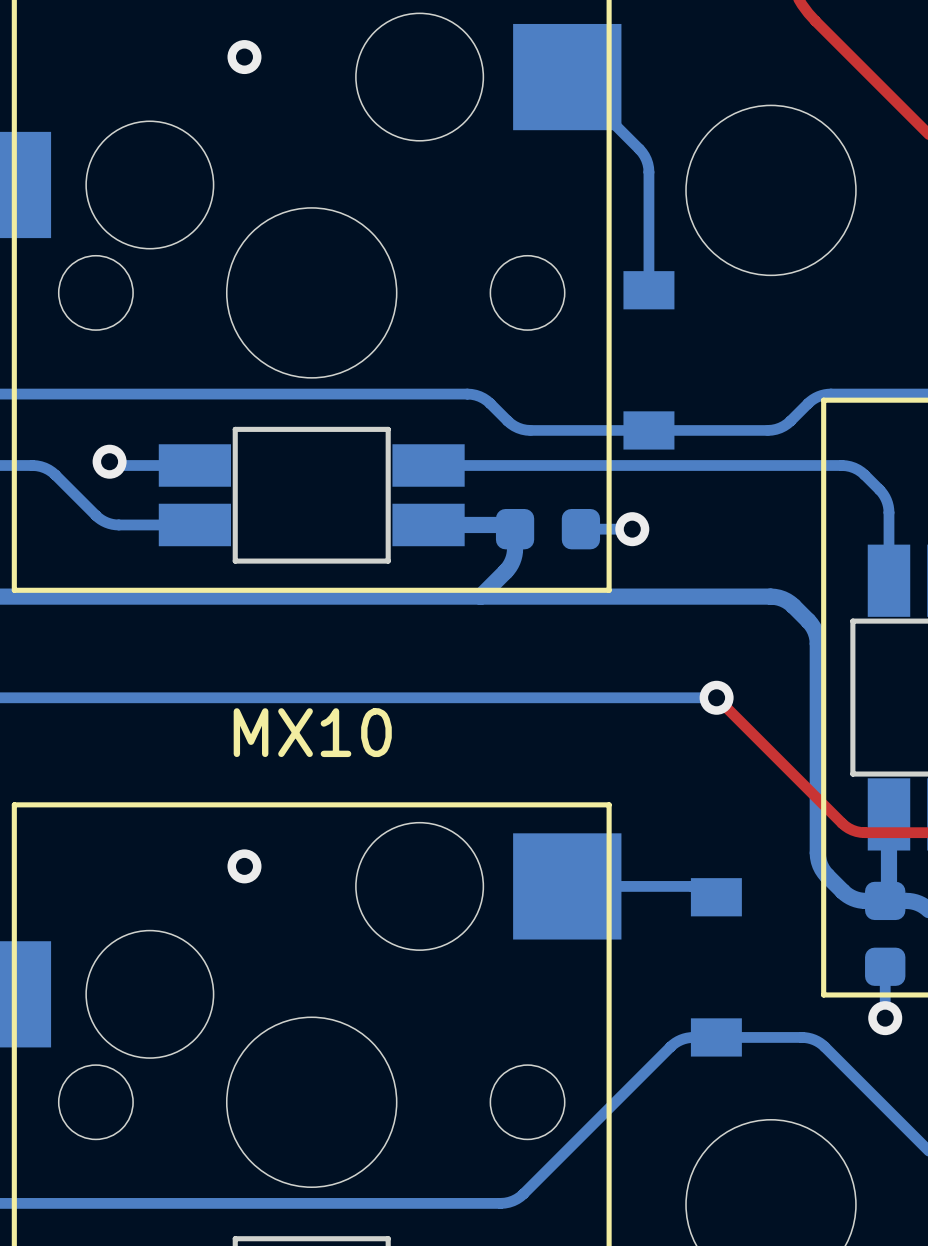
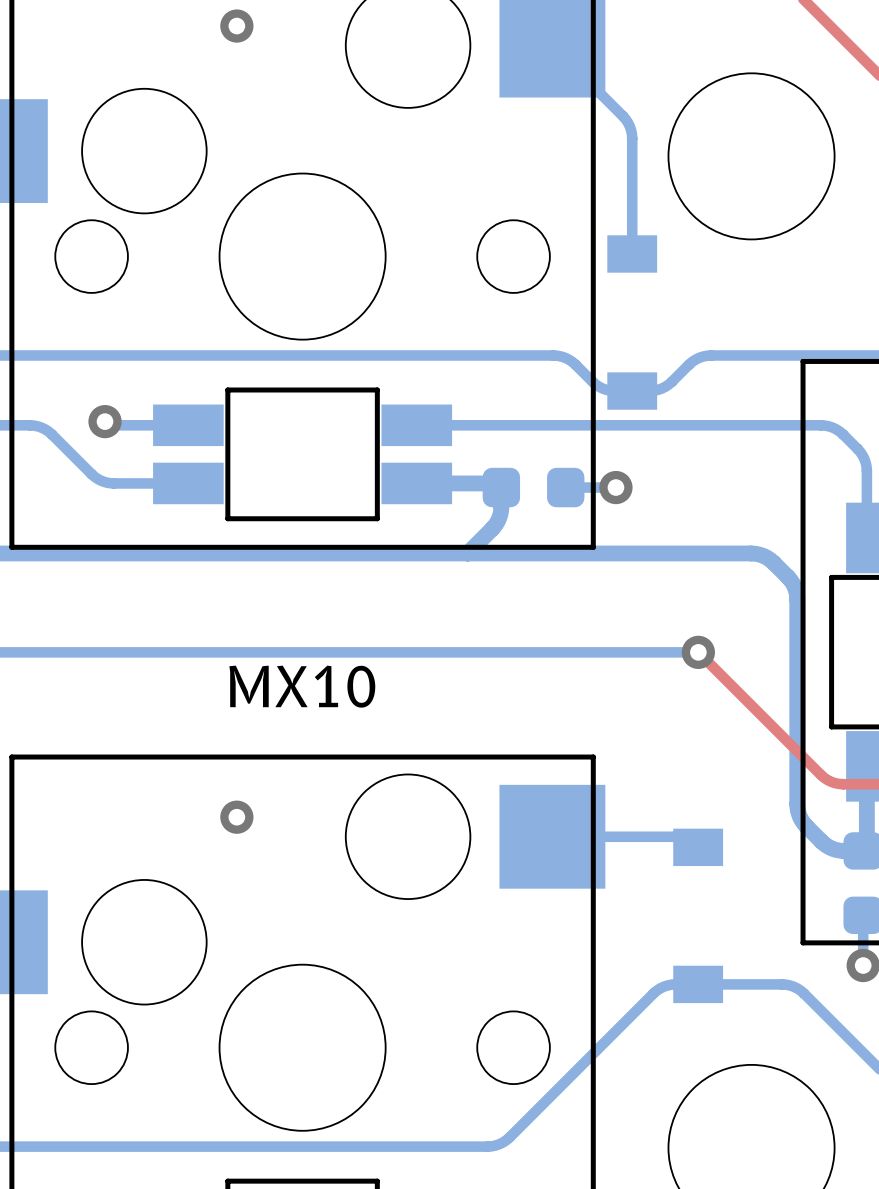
bottom track: (467, 394) (475, 395) (487, 400) (514, 426) (530, 430) (772, 430) (787, 423) (812, 399) (830, 394) -> (649, 391) (665, 386) (692, 362) (703, 356) (810, 355)
bottom track: none -> (454, 355) (561, 356) (572, 362) (599, 386) (614, 391)

